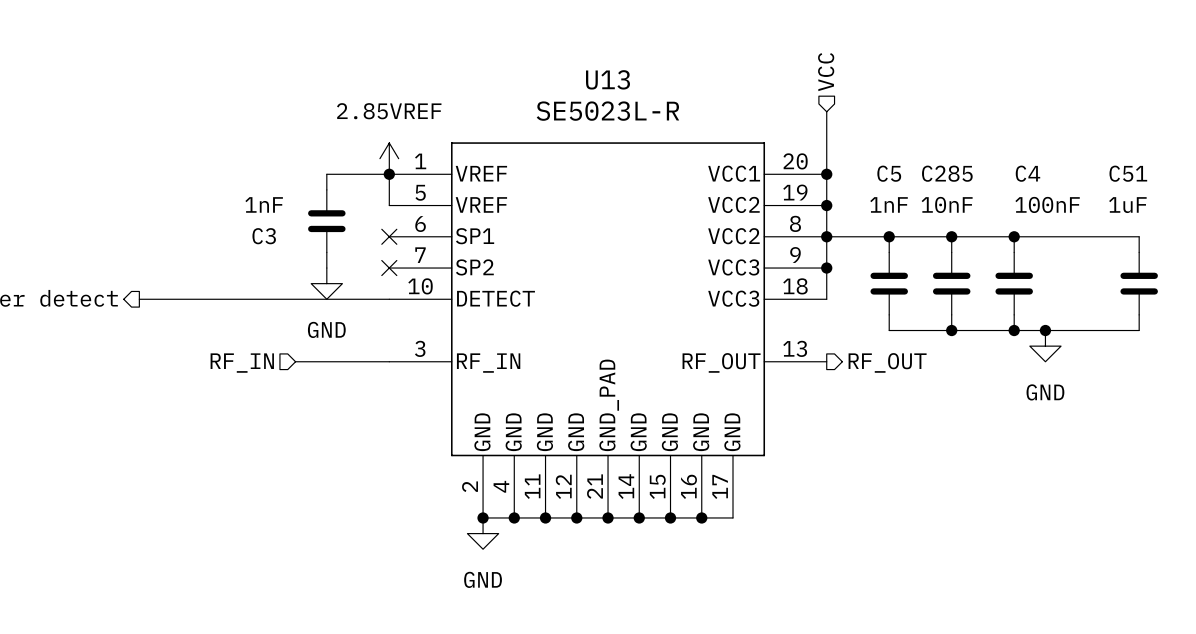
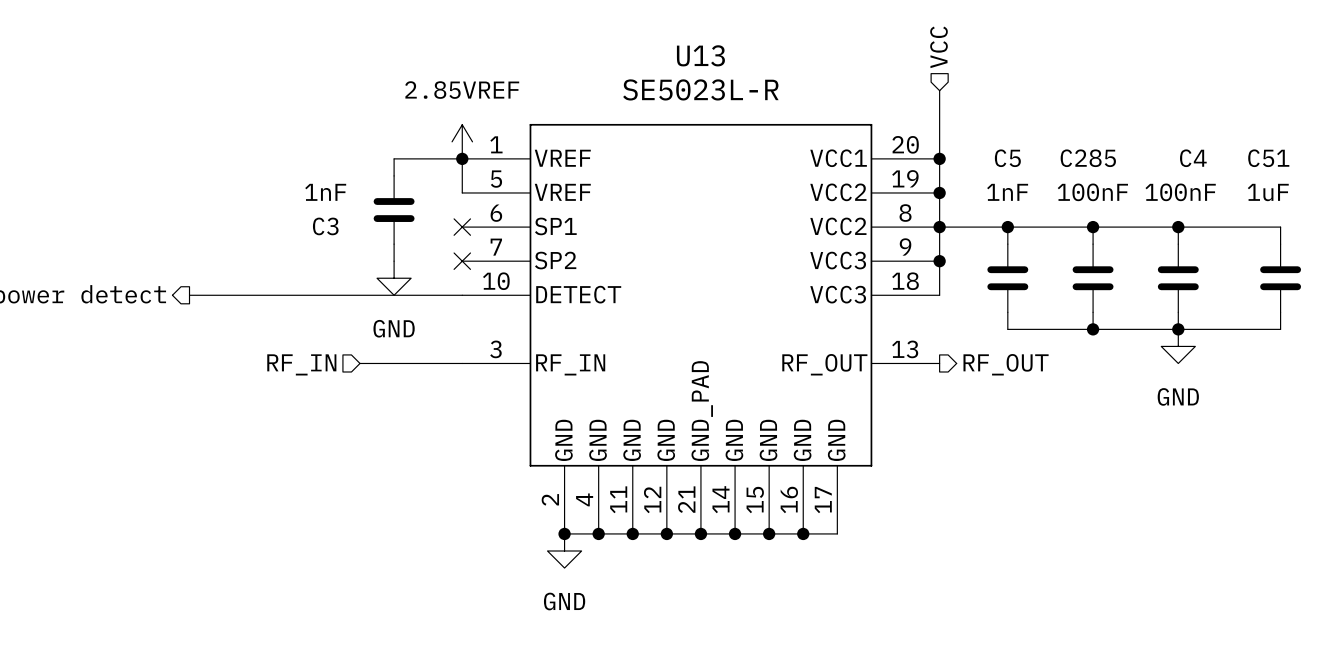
C285 value: 10nF (947, 204) -> 100nF (1092, 192)
junction position: (951, 236) -> (1093, 227)
junction: (1014, 236) -> none
junction: none -> (1178, 227)
C285 position: (951, 283) -> (1093, 278)
C4 position: (1014, 283) -> (1178, 278)
junction position: (951, 330) -> (1093, 329)
junction: (1014, 330) -> none

